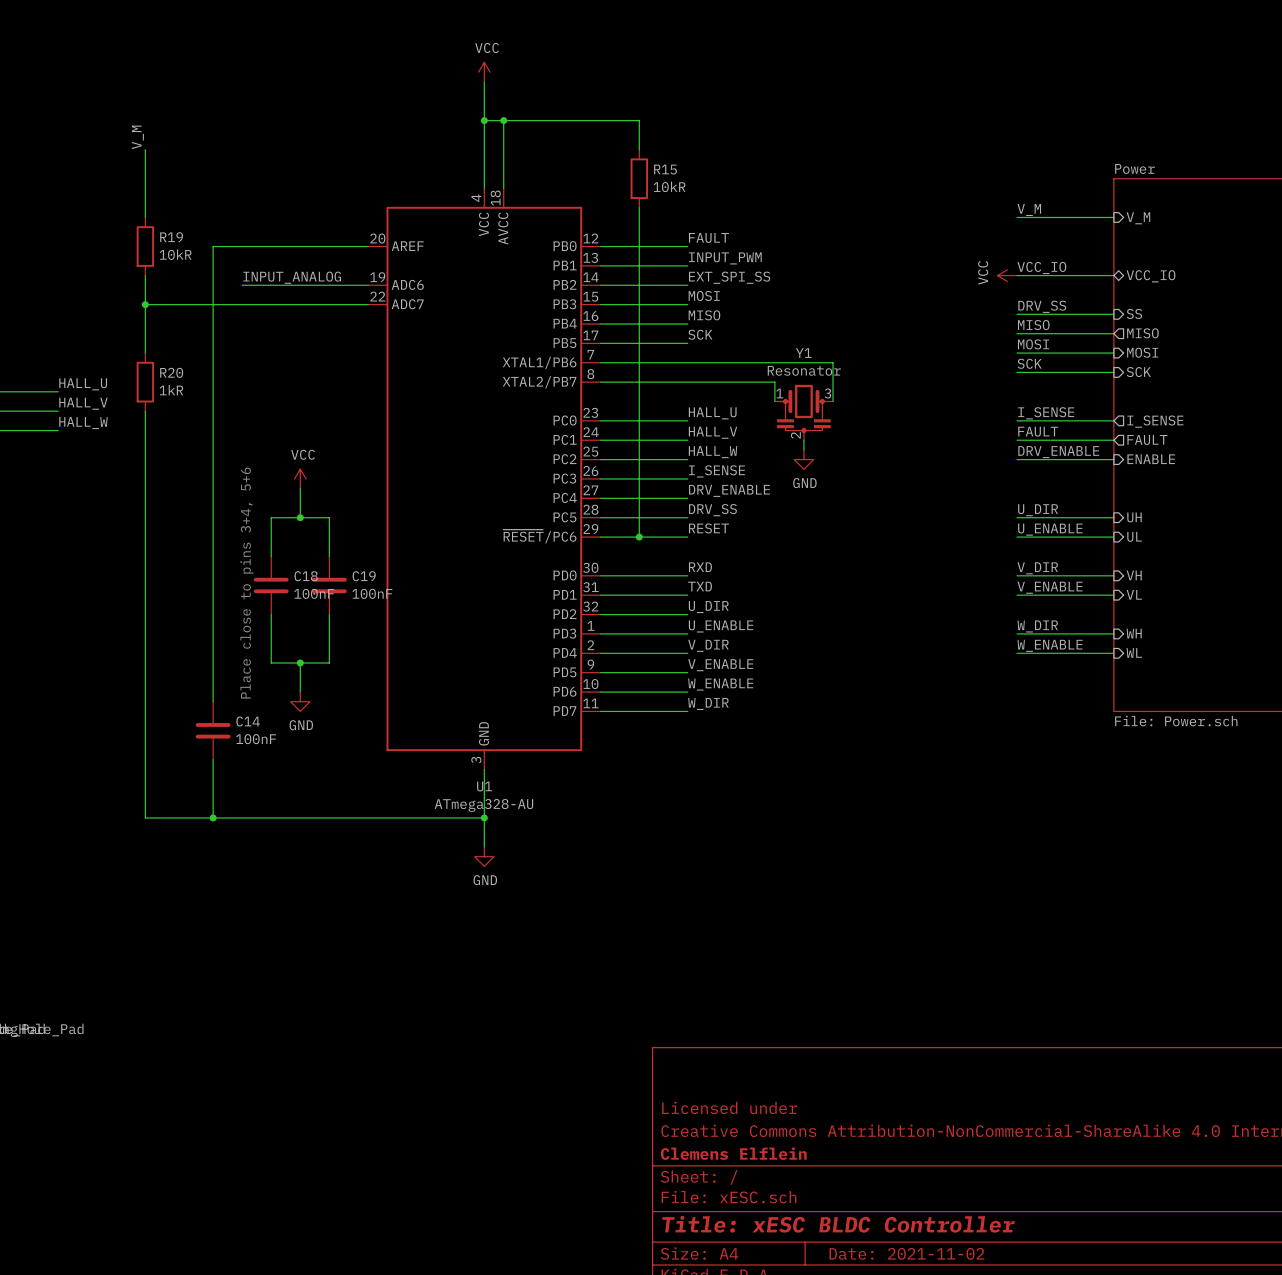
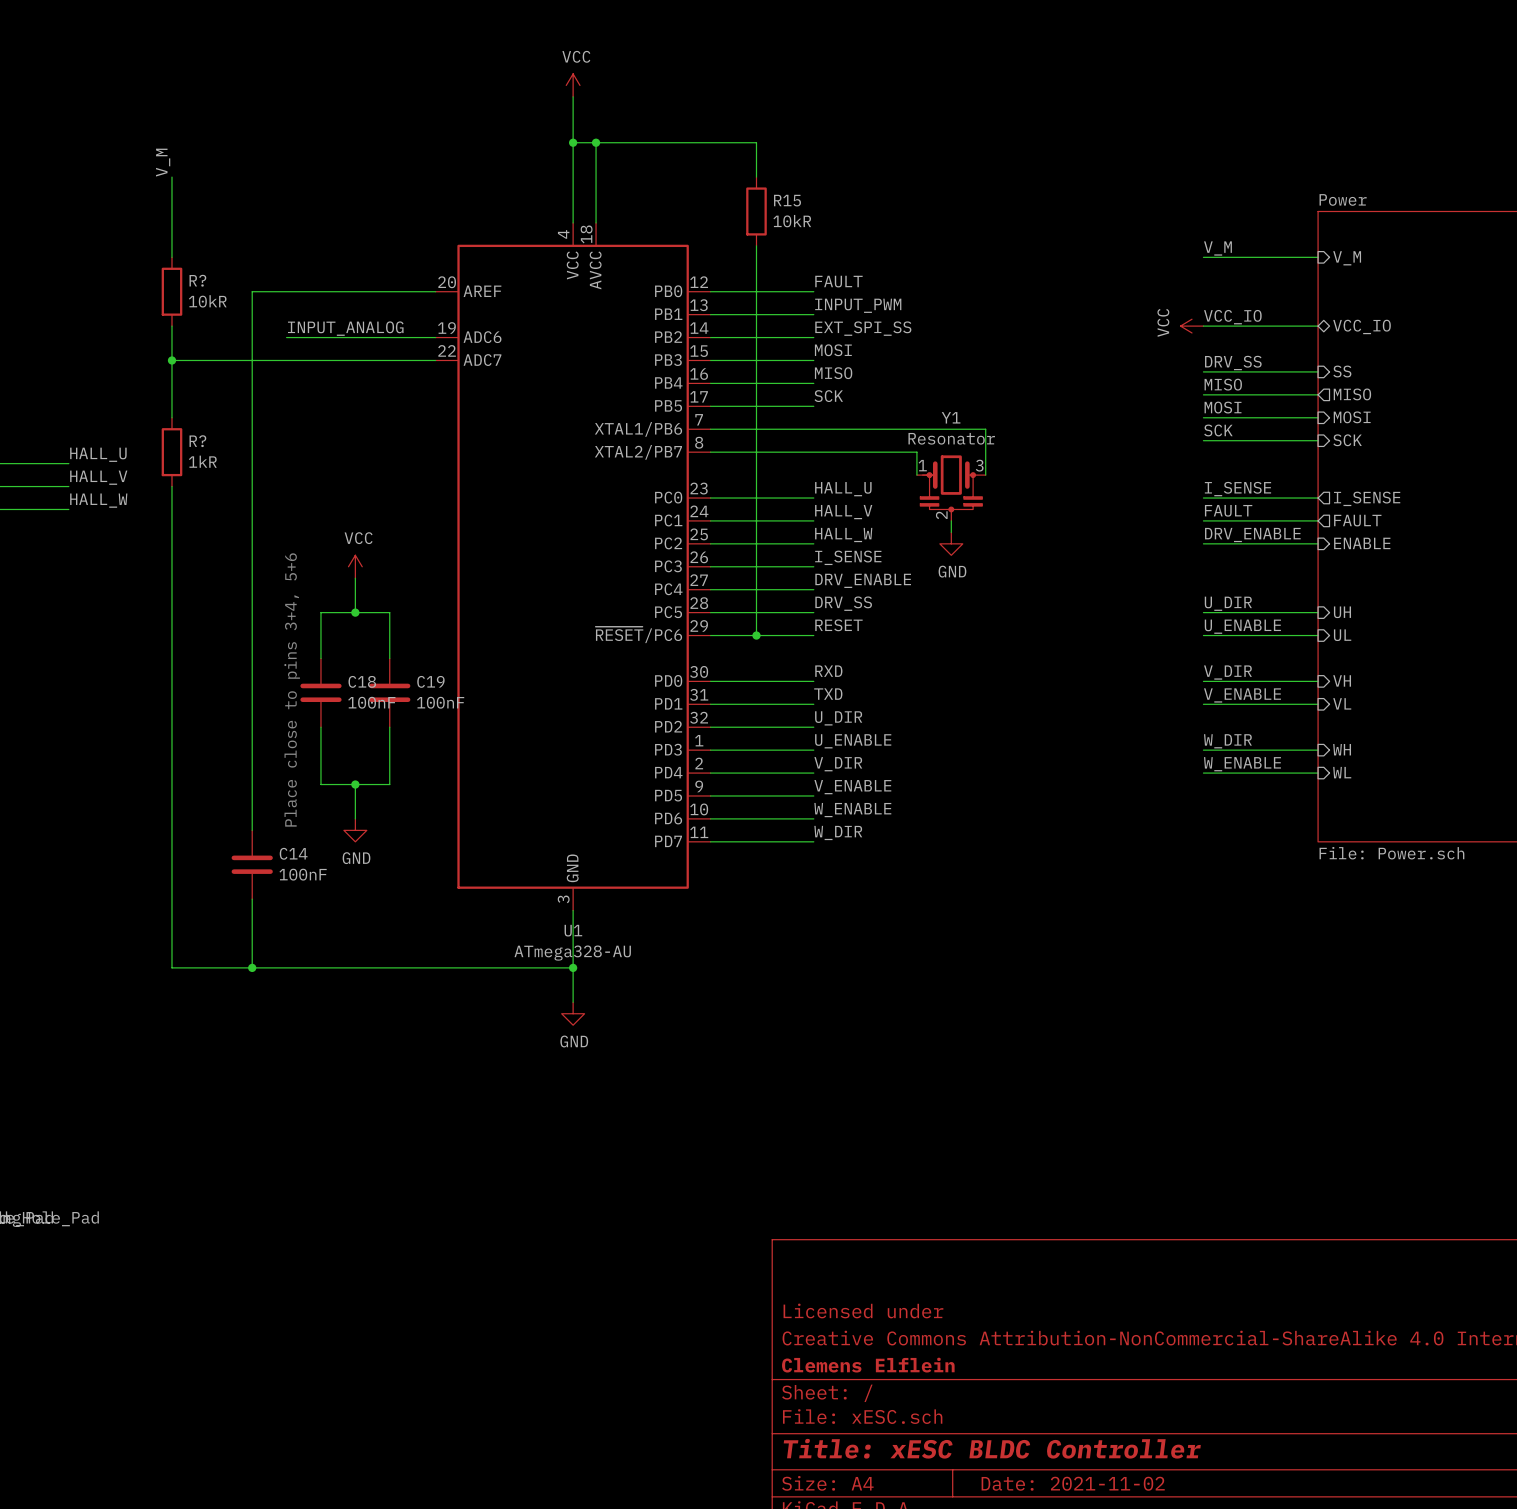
R19 name: R19 (171, 237) -> R? (197, 280)
R20 name: R20 (171, 372) -> R? (197, 441)

